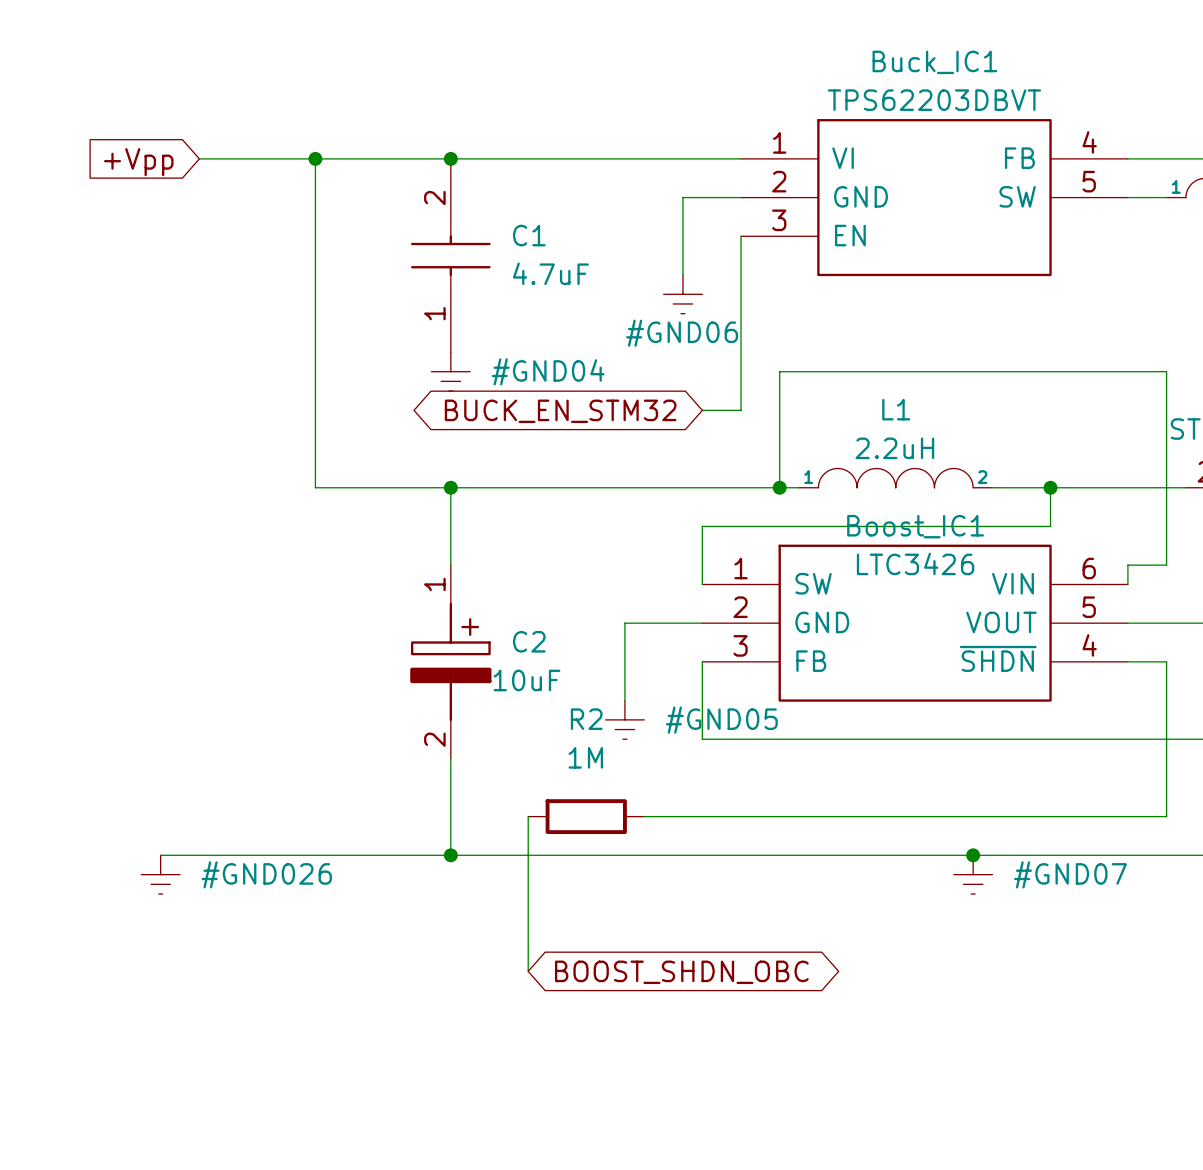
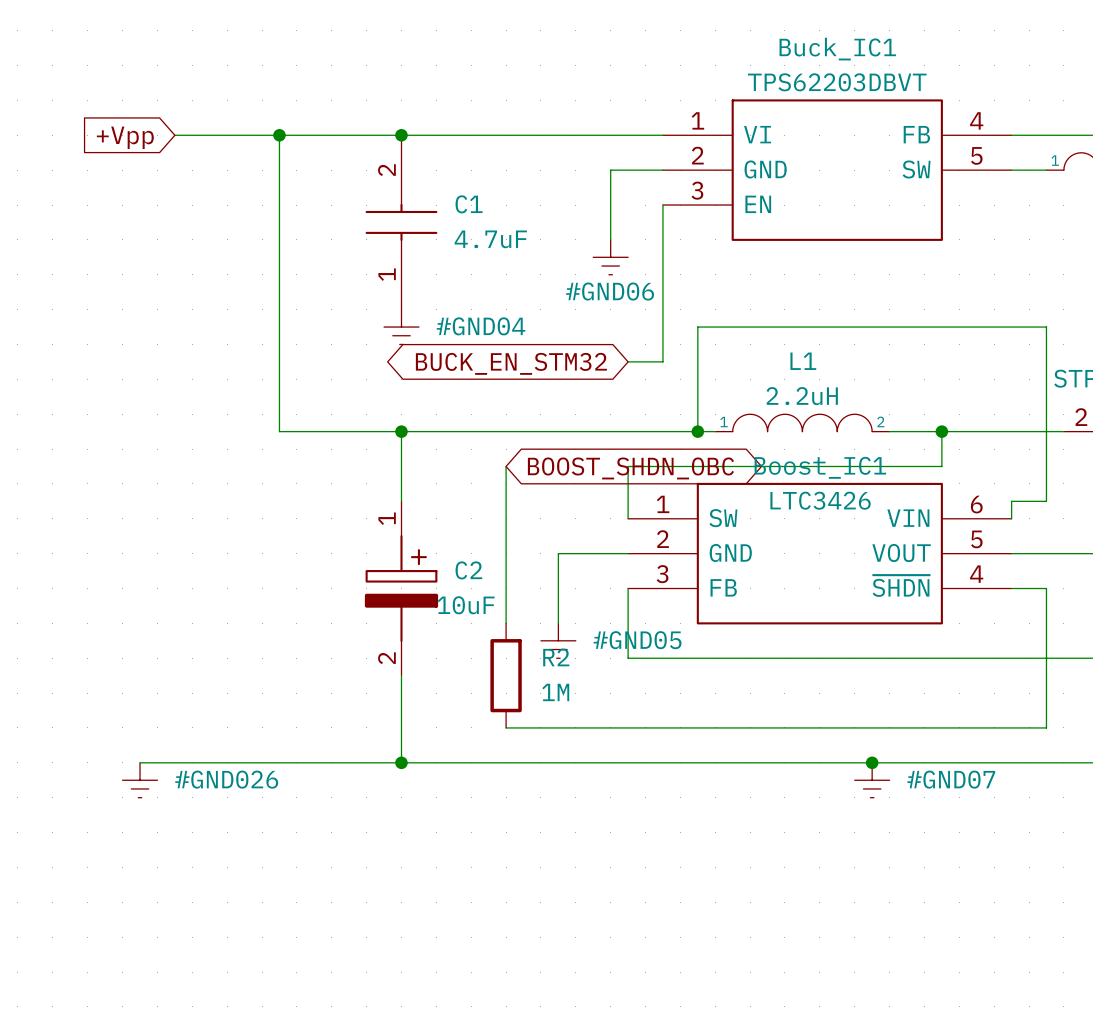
wire: none -> (506, 466) (506, 623)
global label: none -> BOOST_SHDN_OBC (630, 468)
R2 name position: R2 (586, 719) -> R2 (556, 657)
wire: (528, 816) (528, 971) -> none
wire: none -> (506, 727) (575, 727)
R2 rotation: 0° (586, 816) -> 90° clockwise (506, 675)
global label: BOOST_SHDN_OBC (681, 972) -> none

